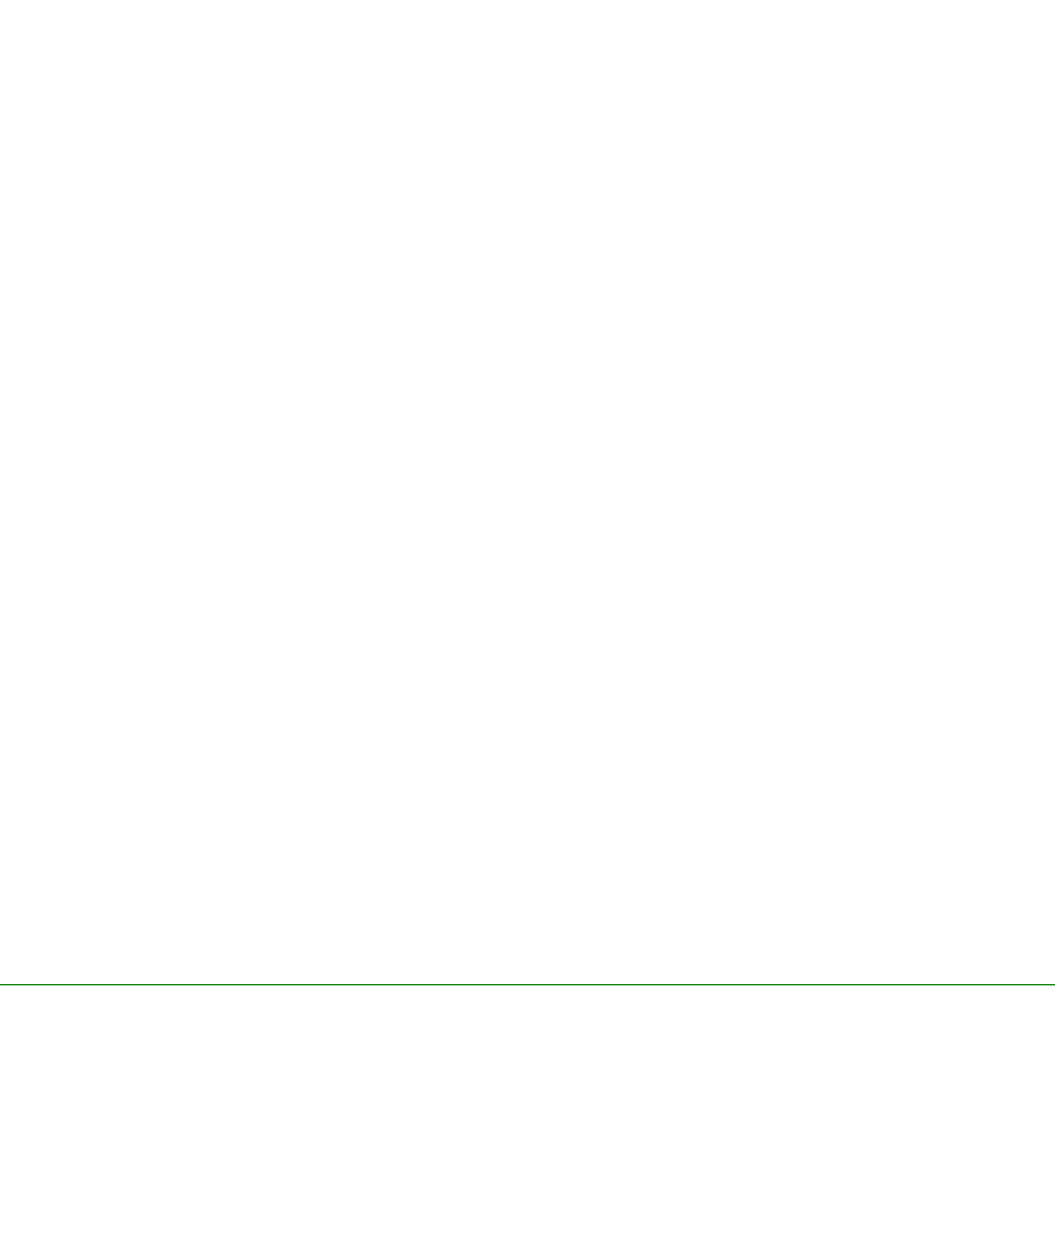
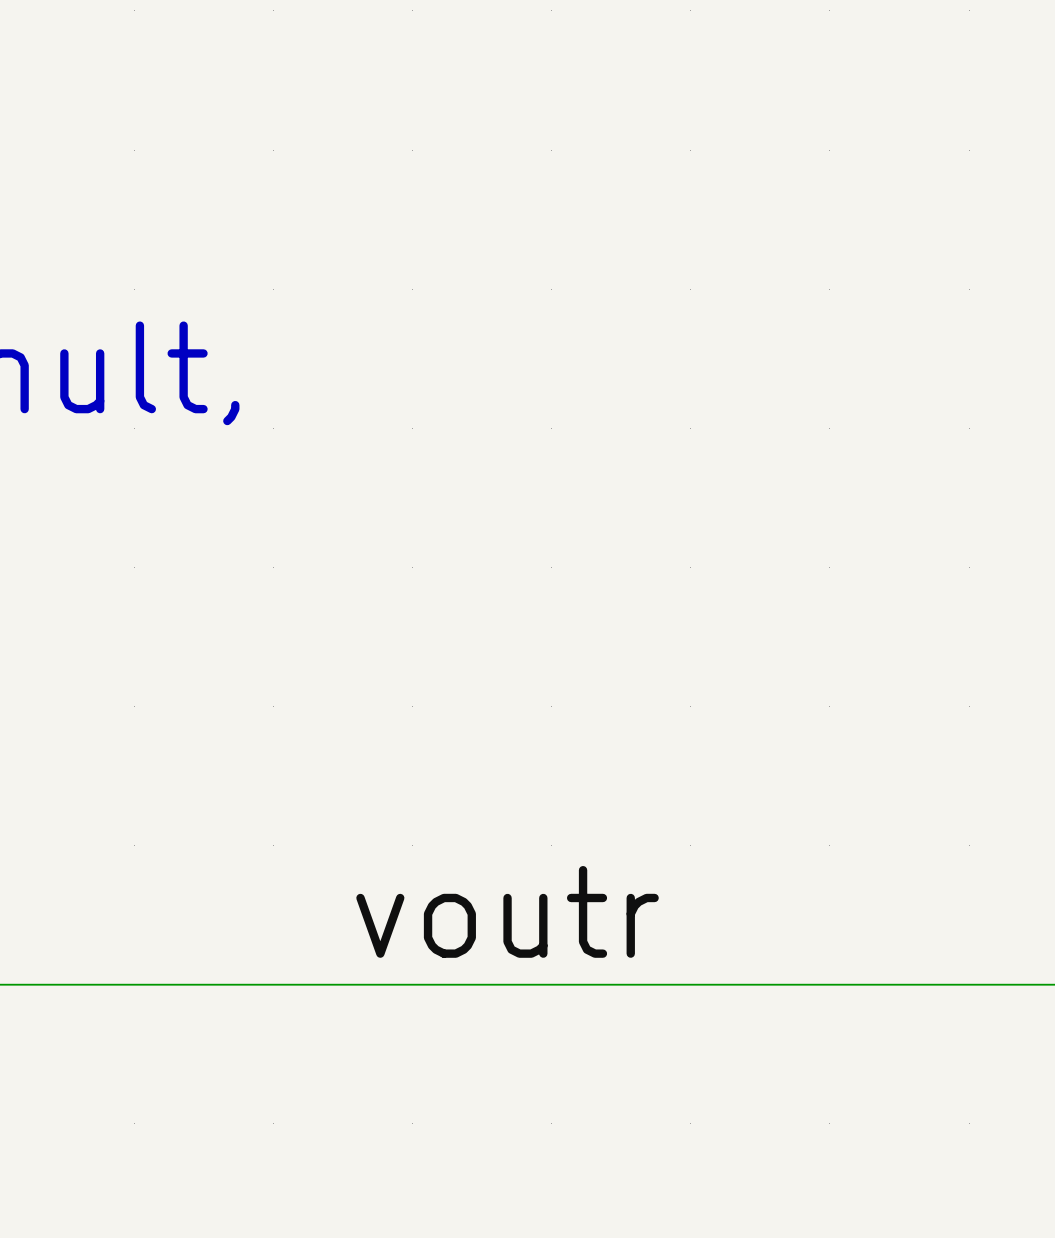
label: none -> voutr (507, 911)

